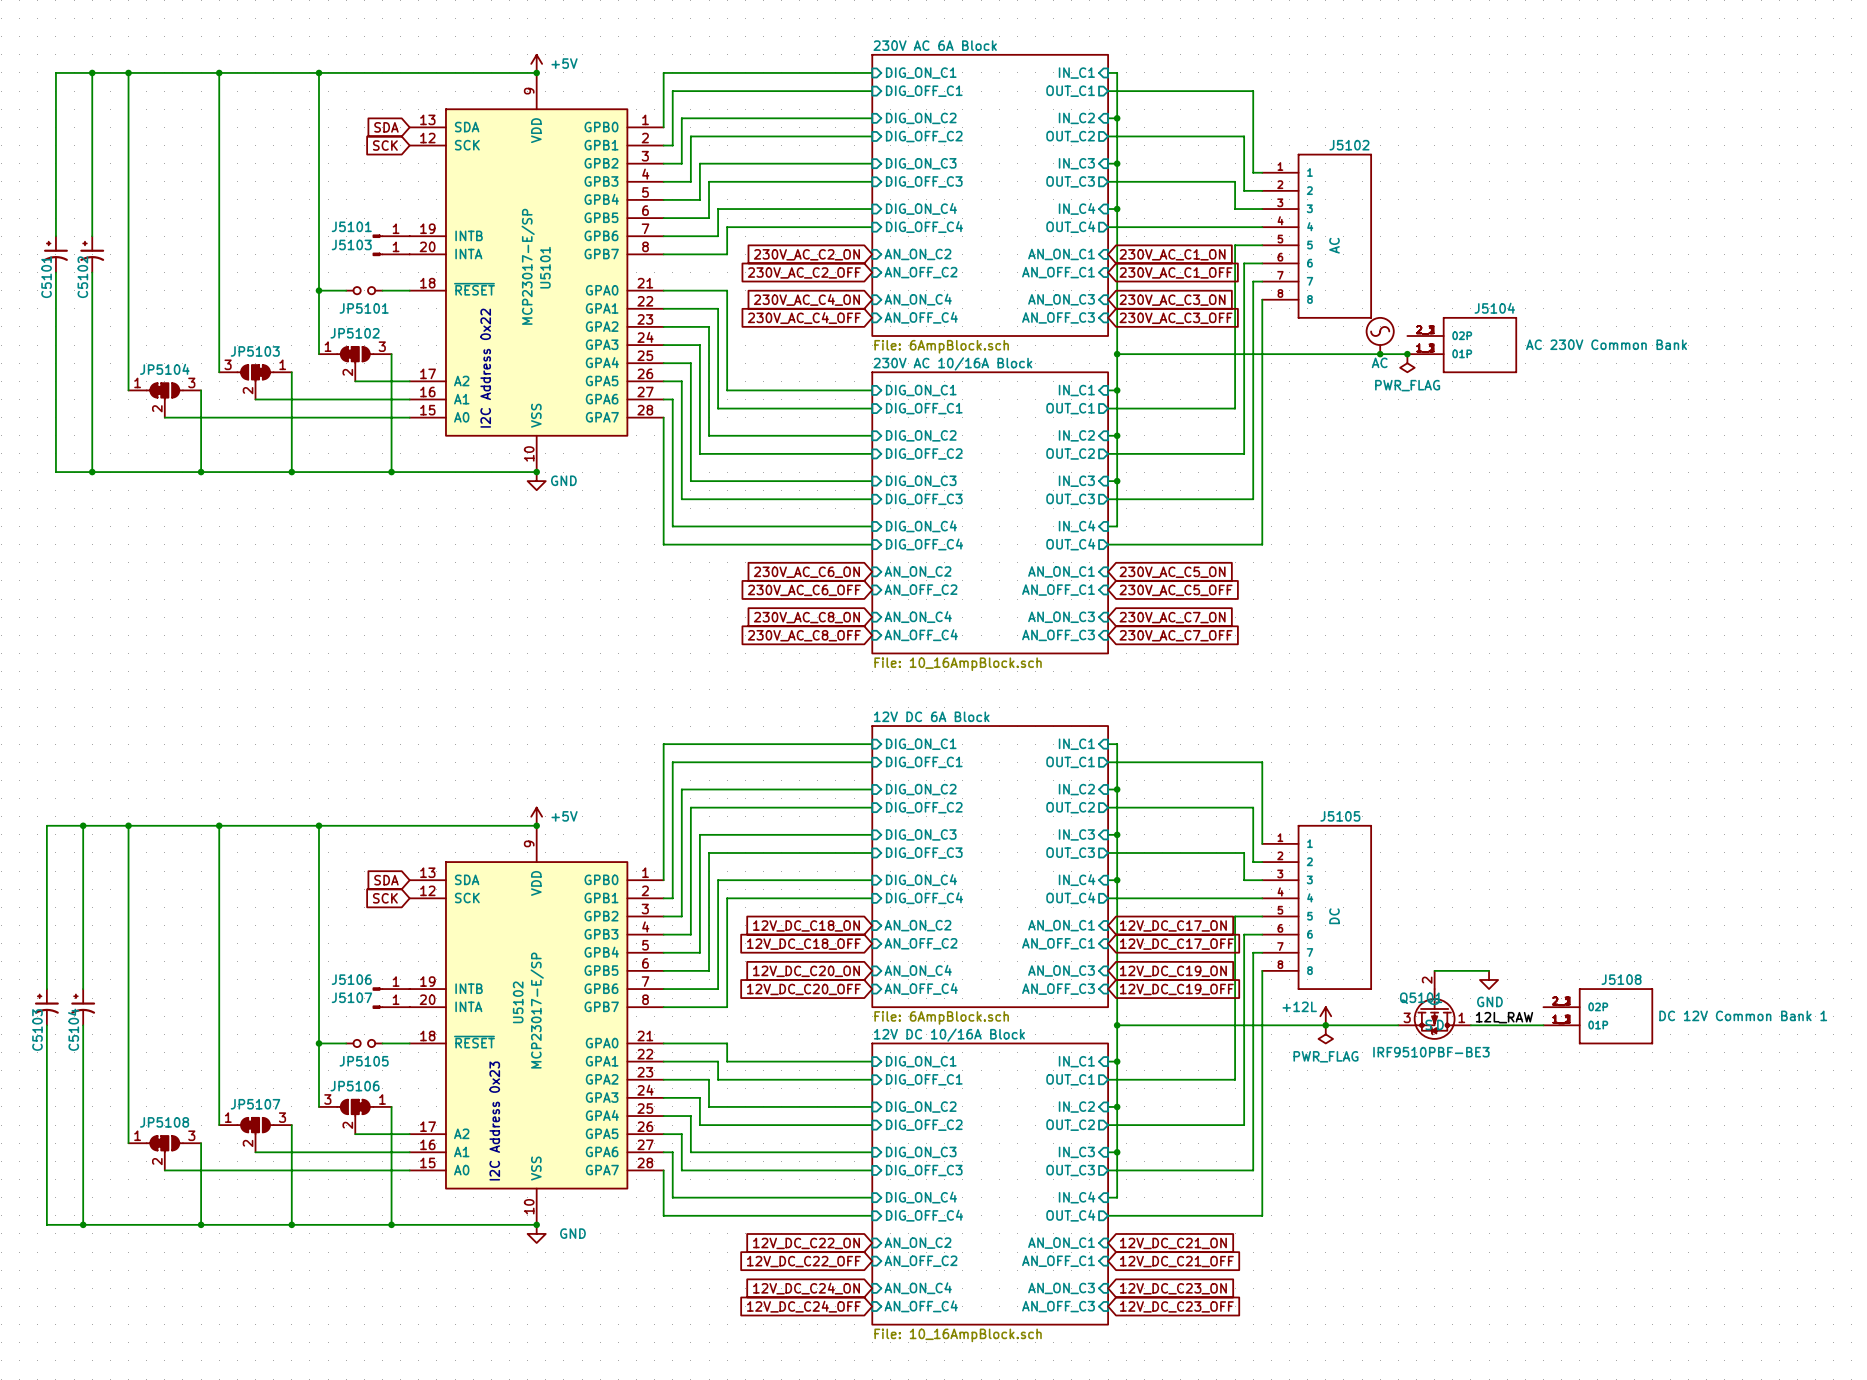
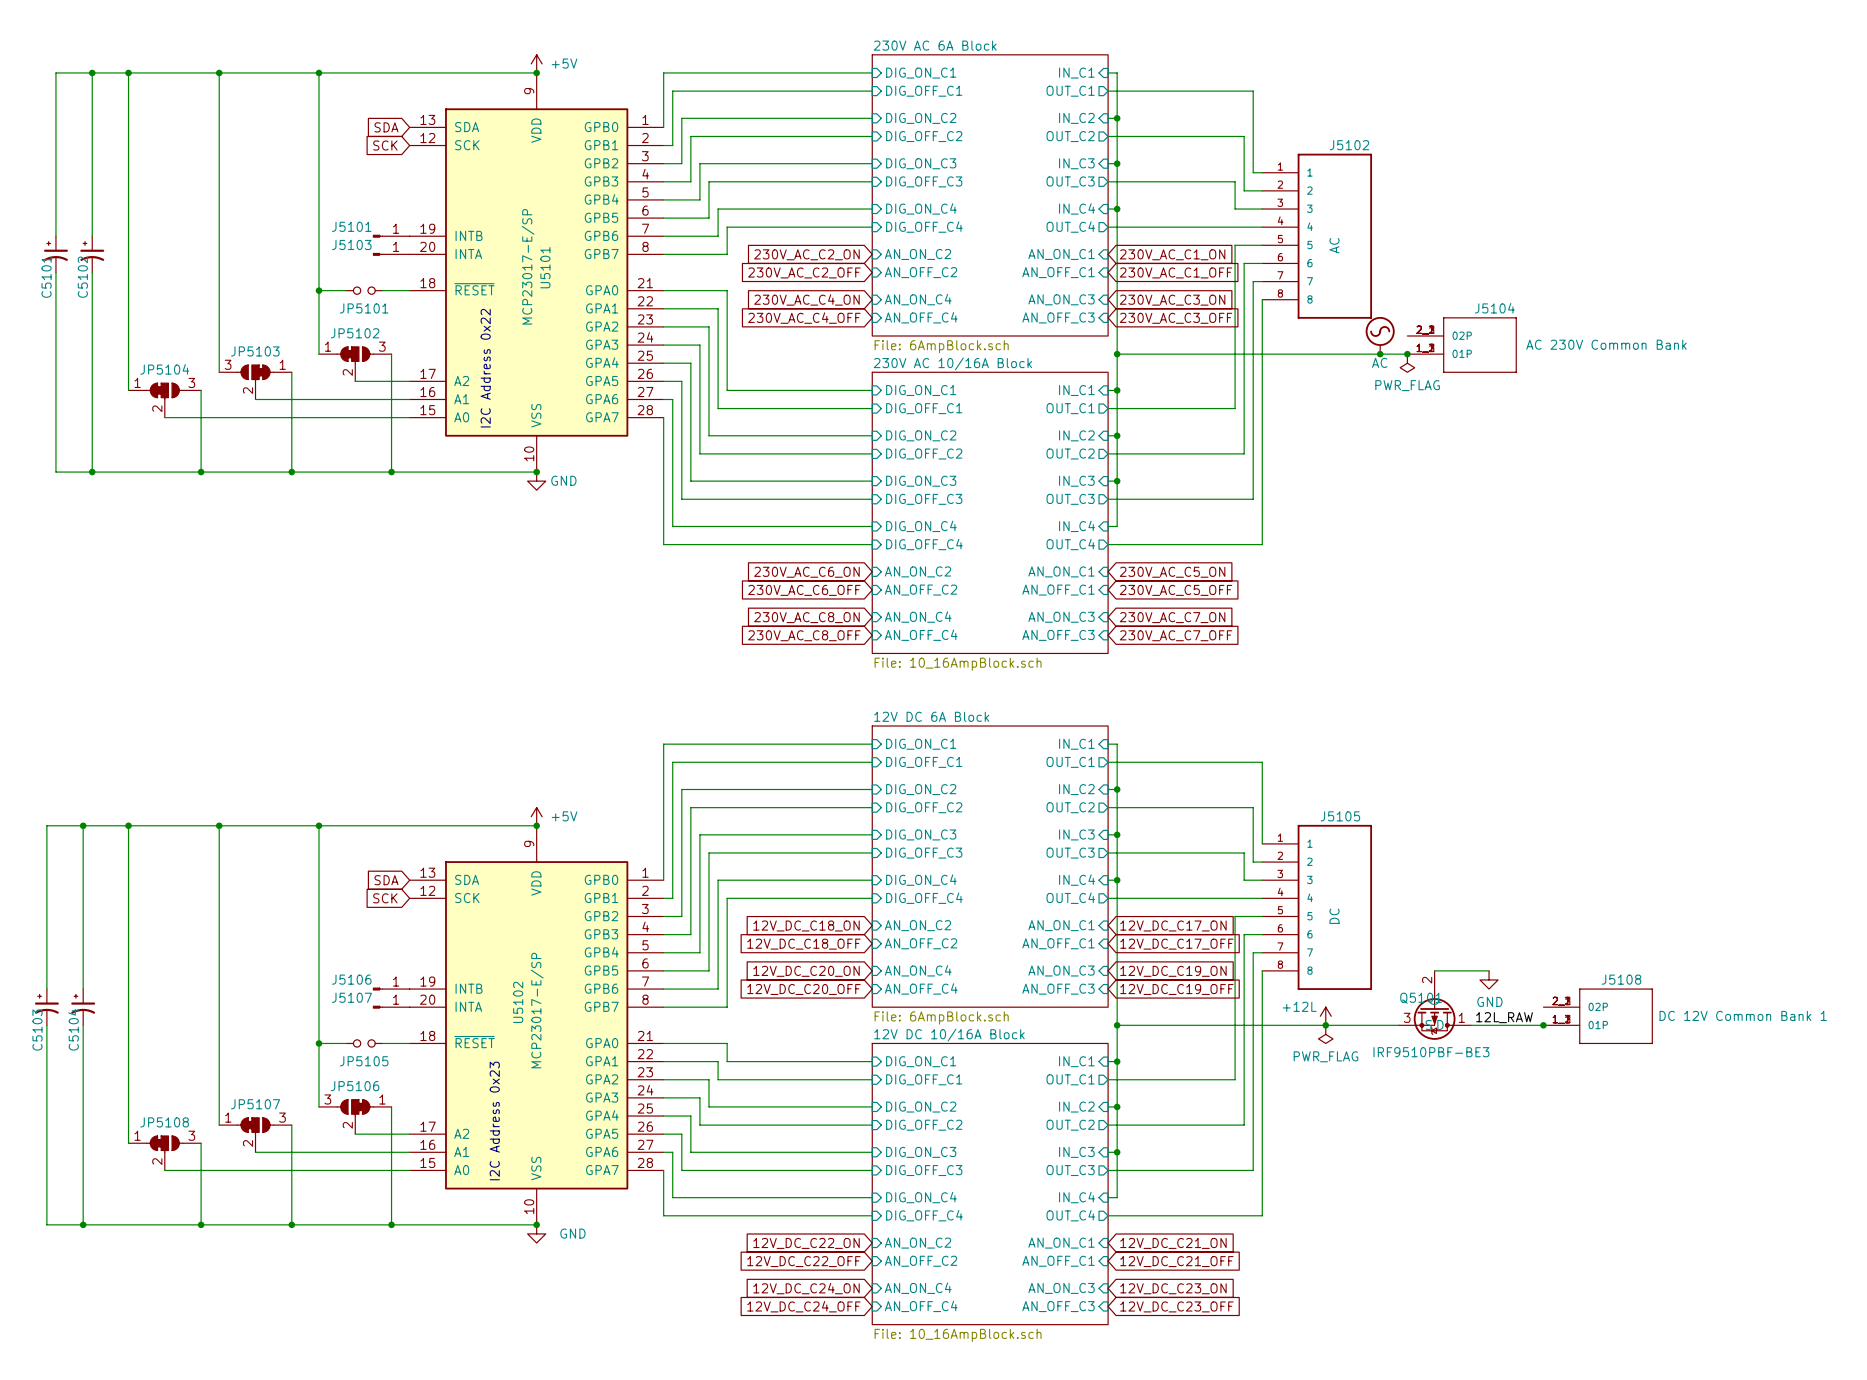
junction: none -> (1543, 1025)

